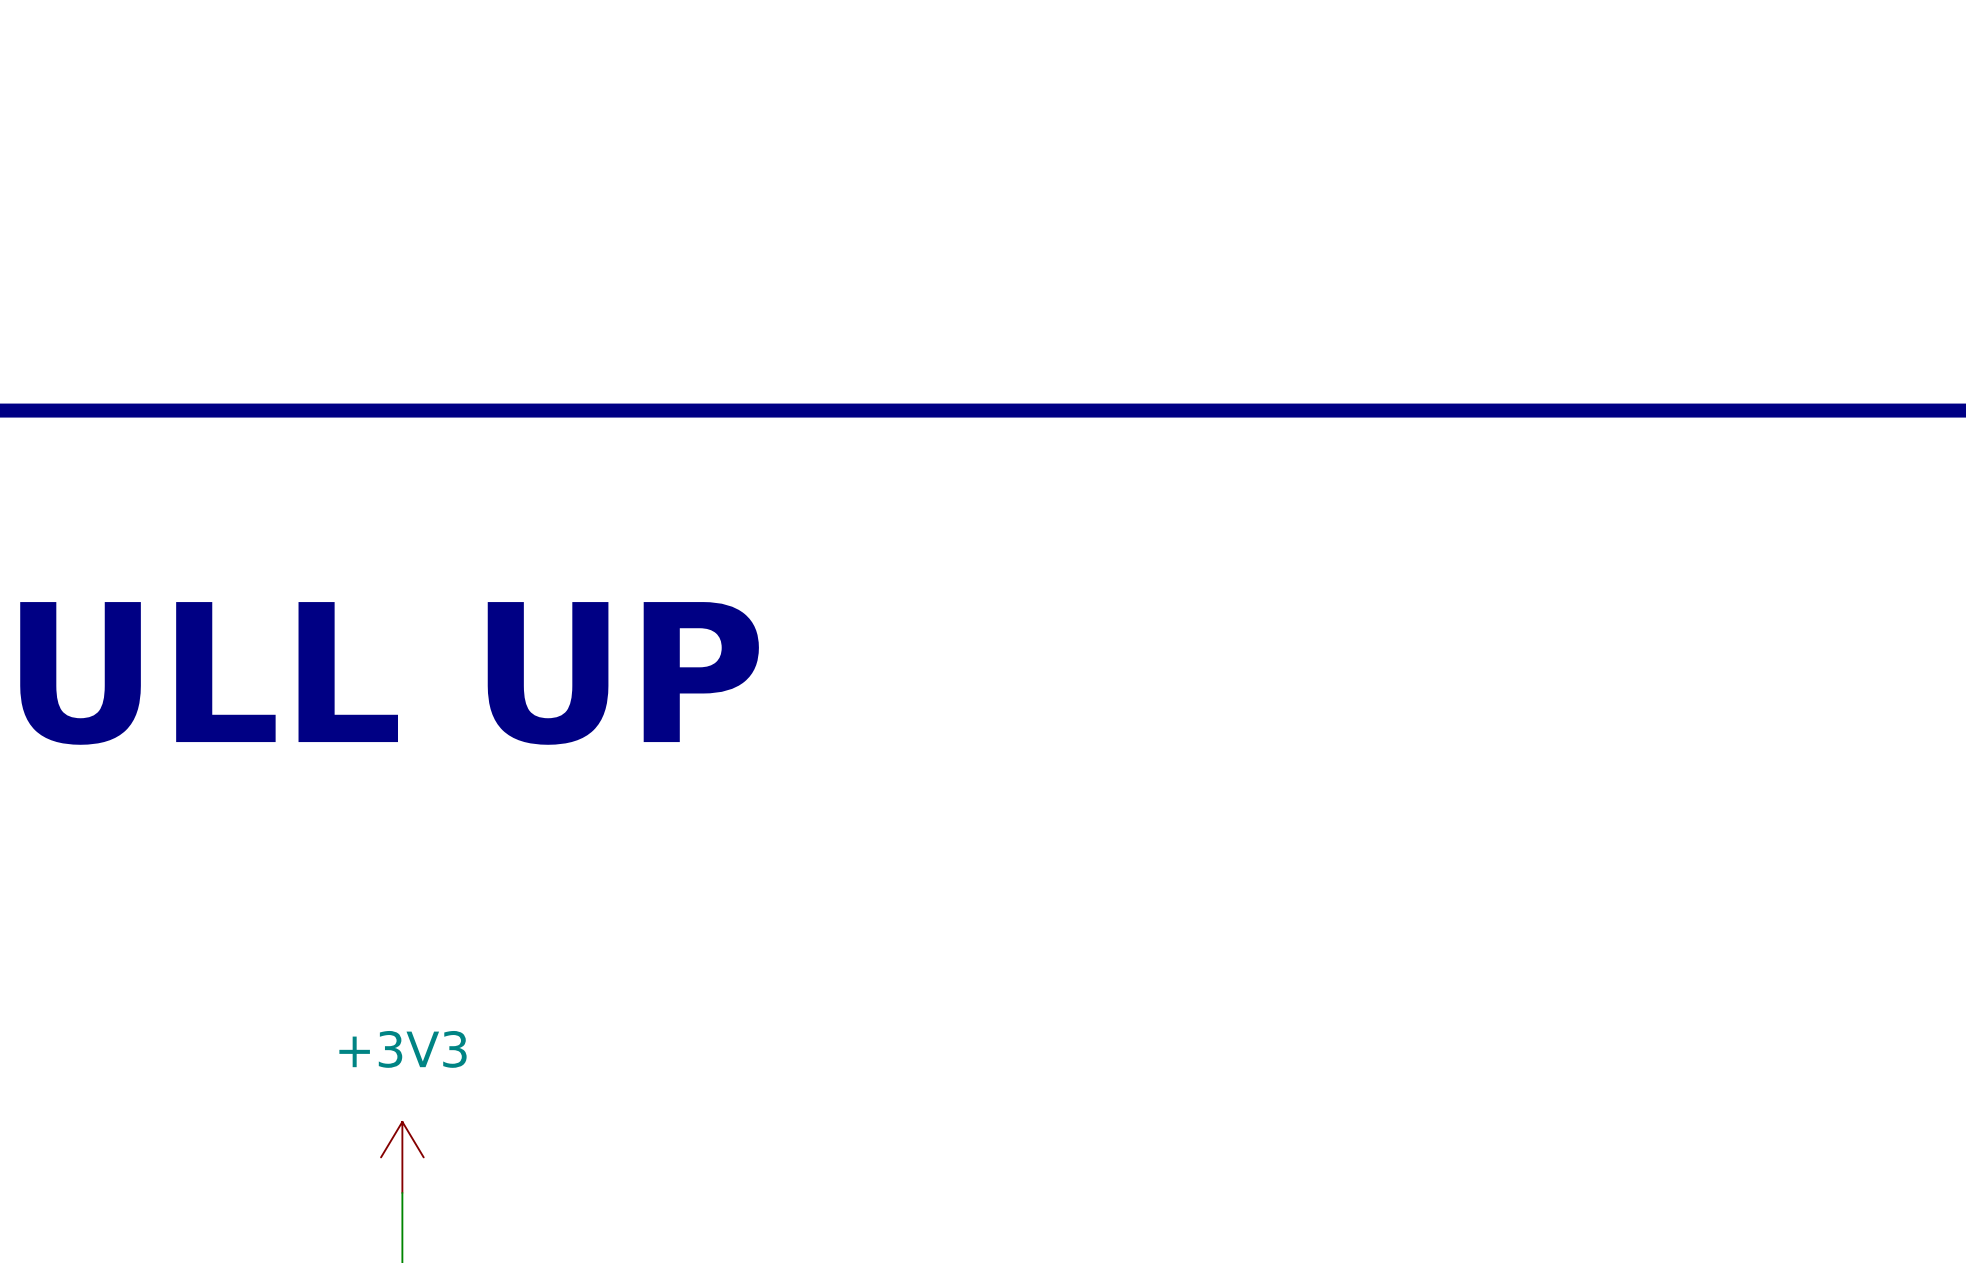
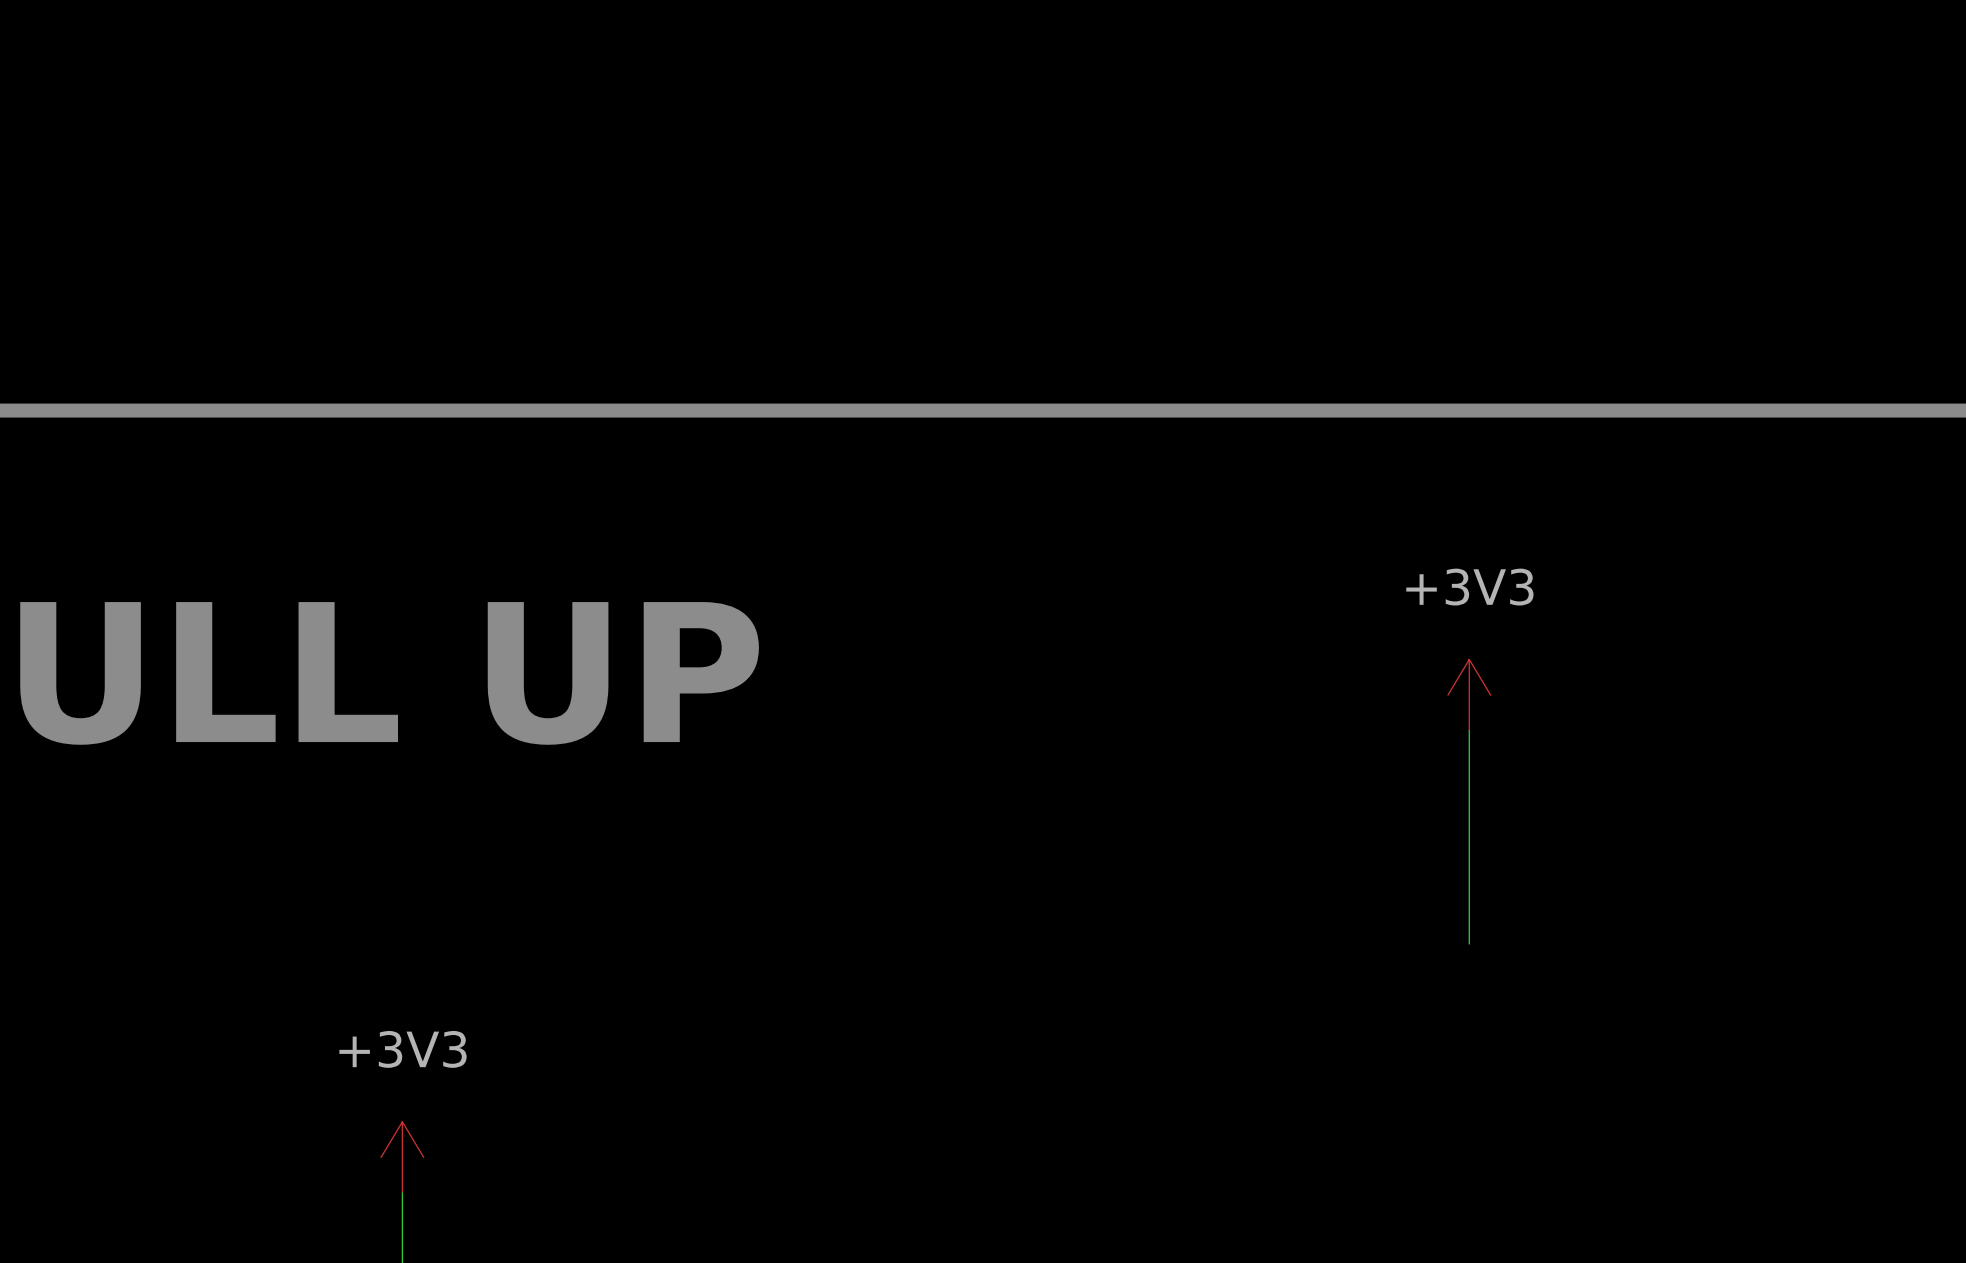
power symbol: none -> +3V3 (1469, 695)
wire: none -> (1469, 730) (1469, 944)

